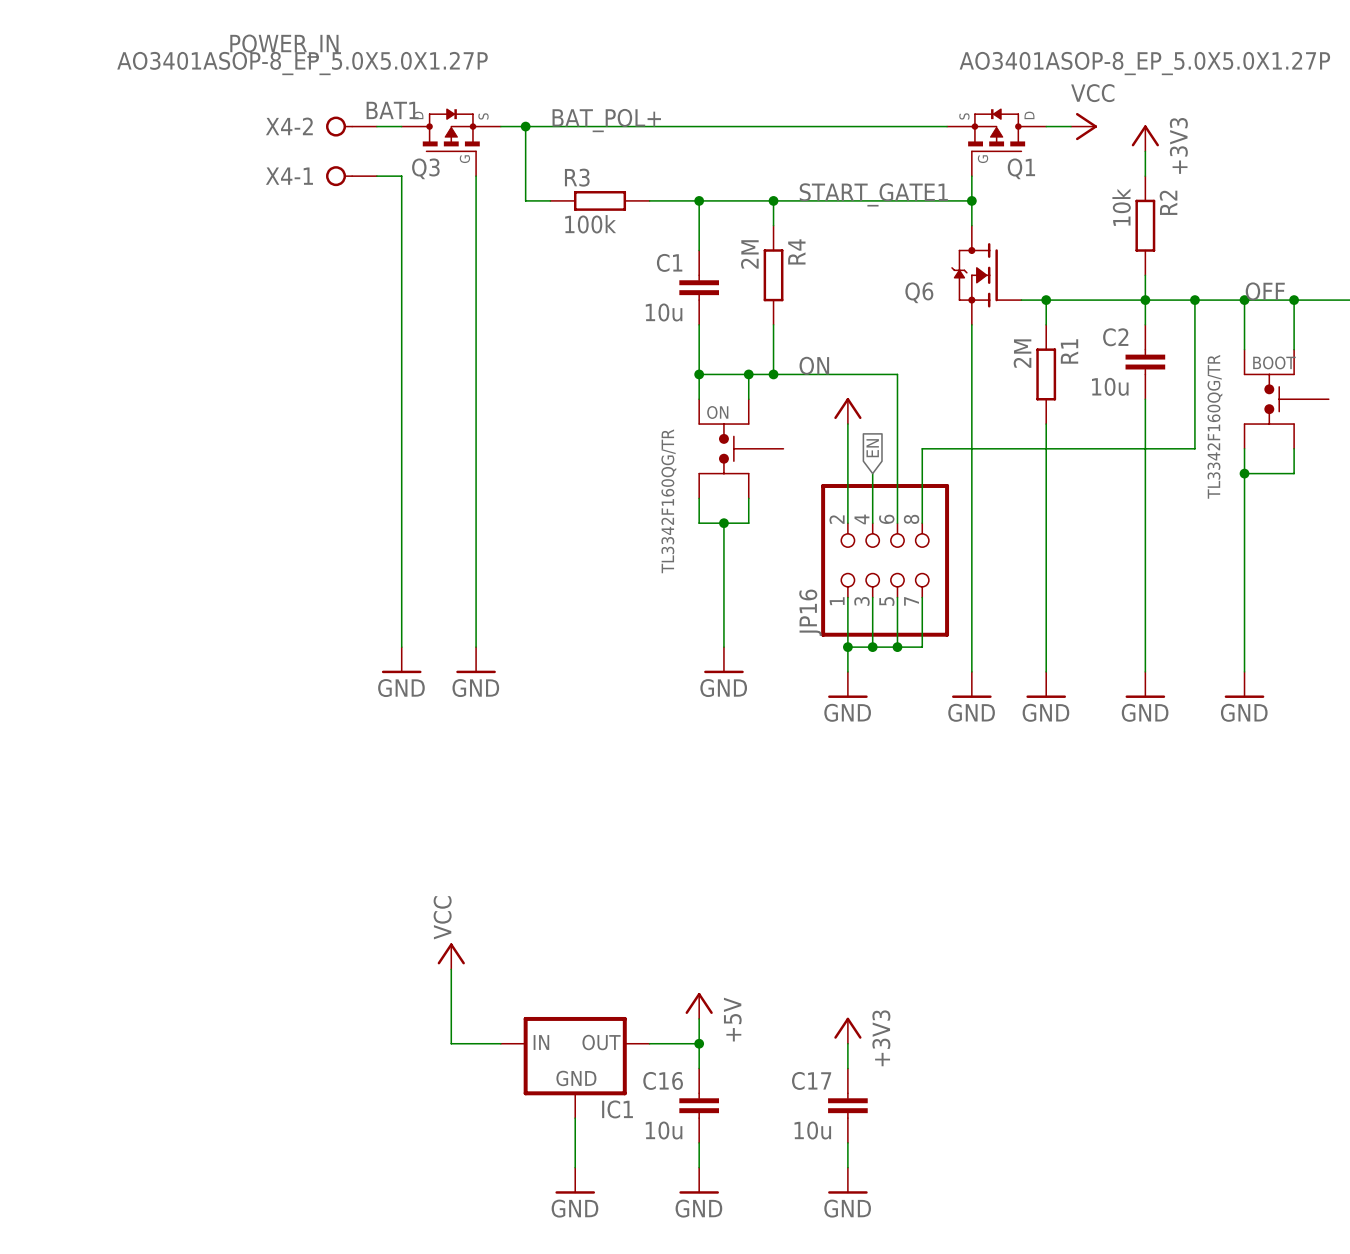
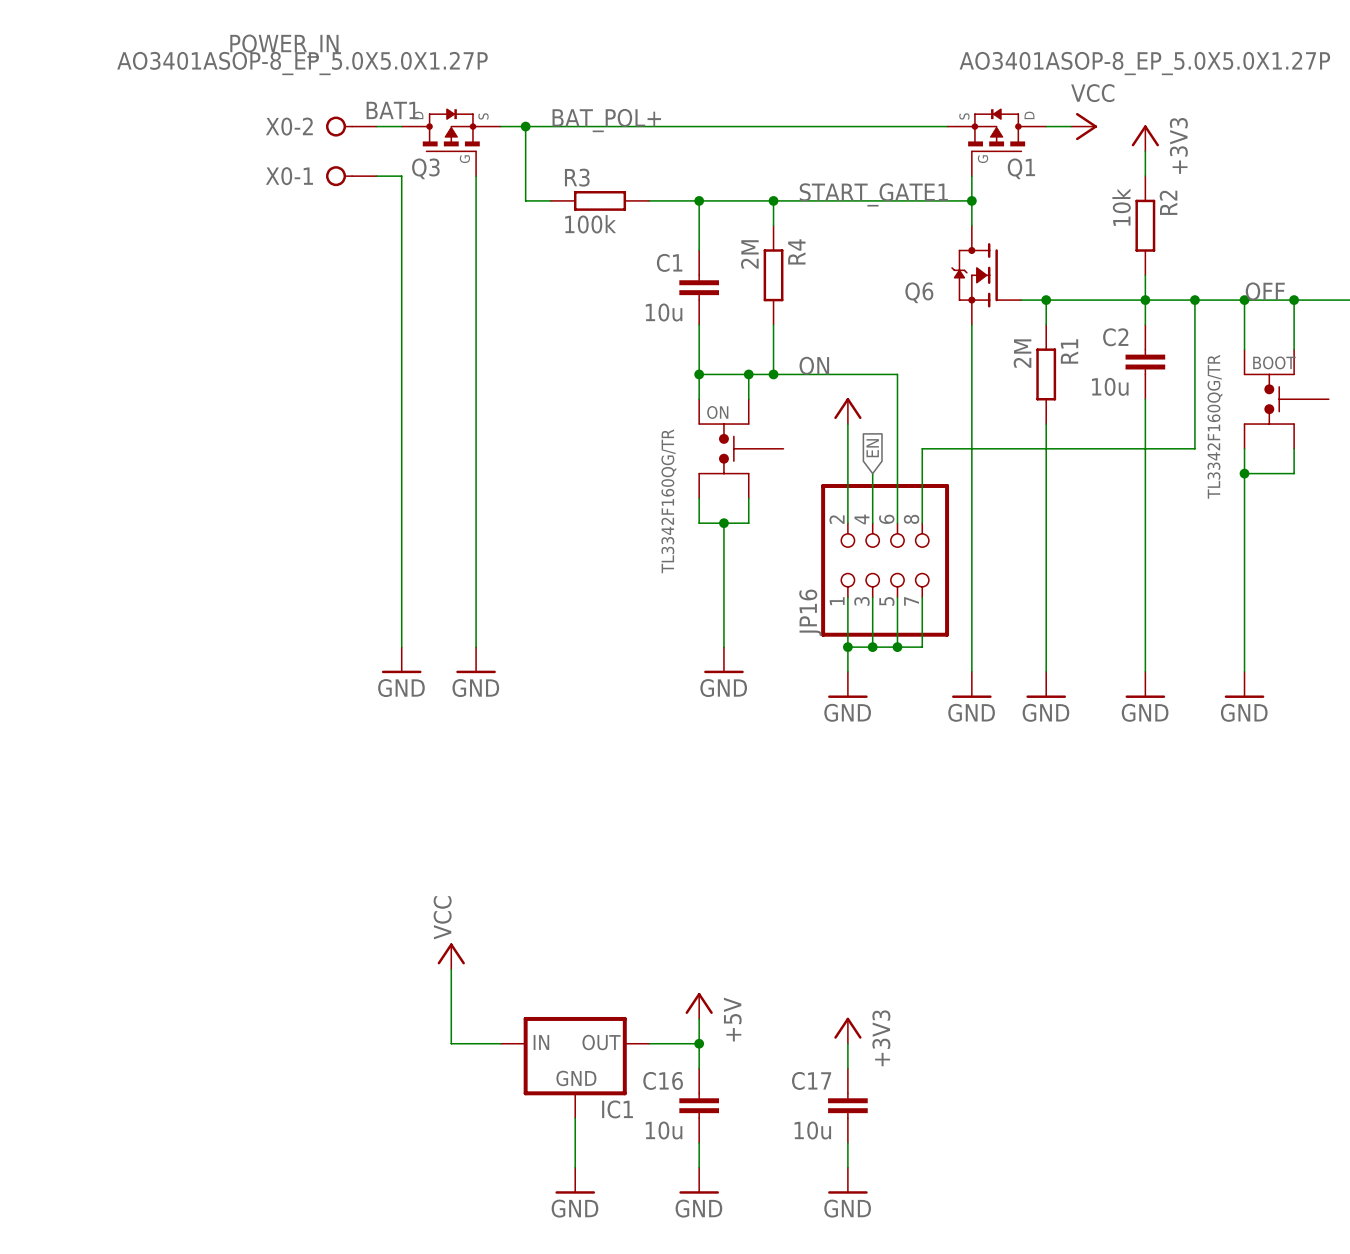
X4-2 name: X4-2 (289, 126) -> X0-2 (289, 126)
X4-1 name: X4-1 (289, 176) -> X0-1 (289, 176)

